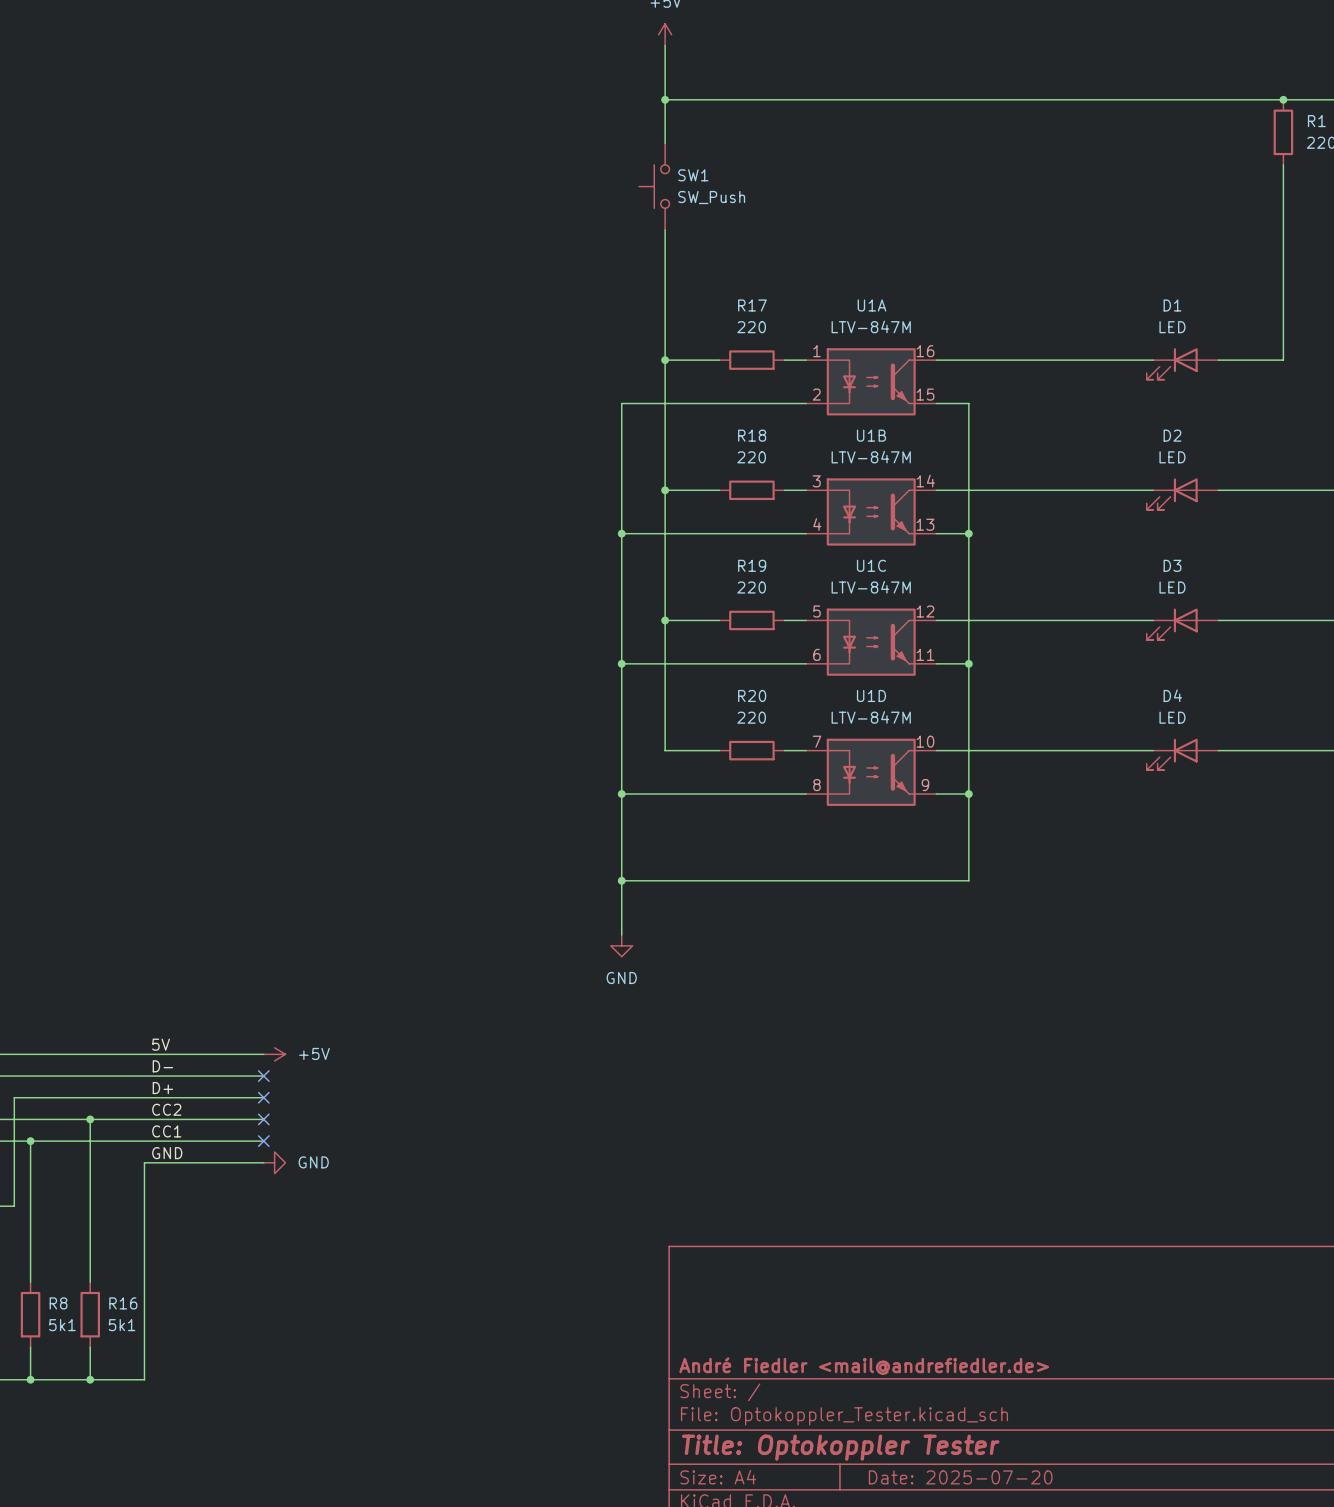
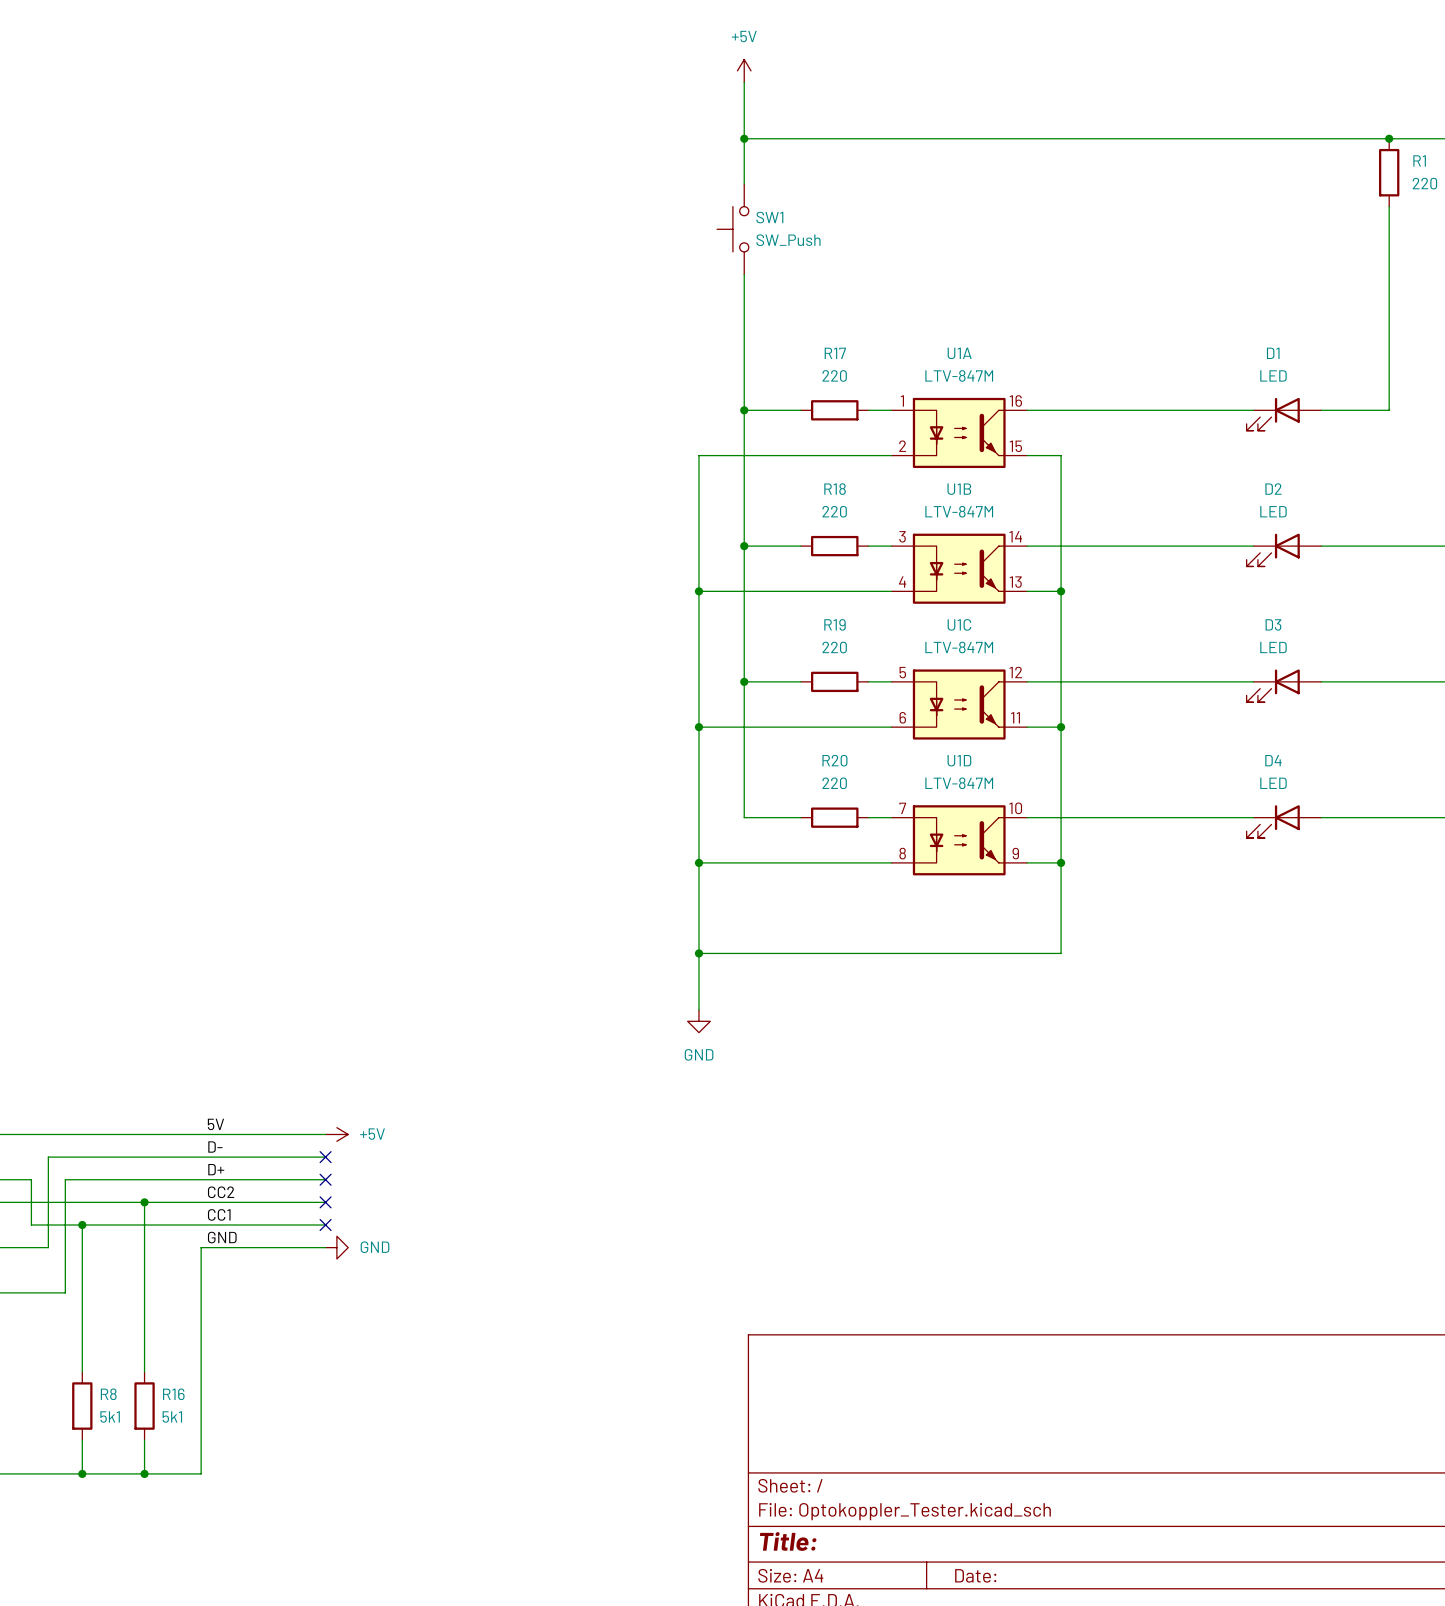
title block: André Fiedler <mail@andrefiedler.de> (864, 1366) -> none
title block: Title: Optokoppler Tester (840, 1447) -> Title: (788, 1541)
title block: Date: 2025-07-20 (960, 1477) -> Date: (975, 1575)

